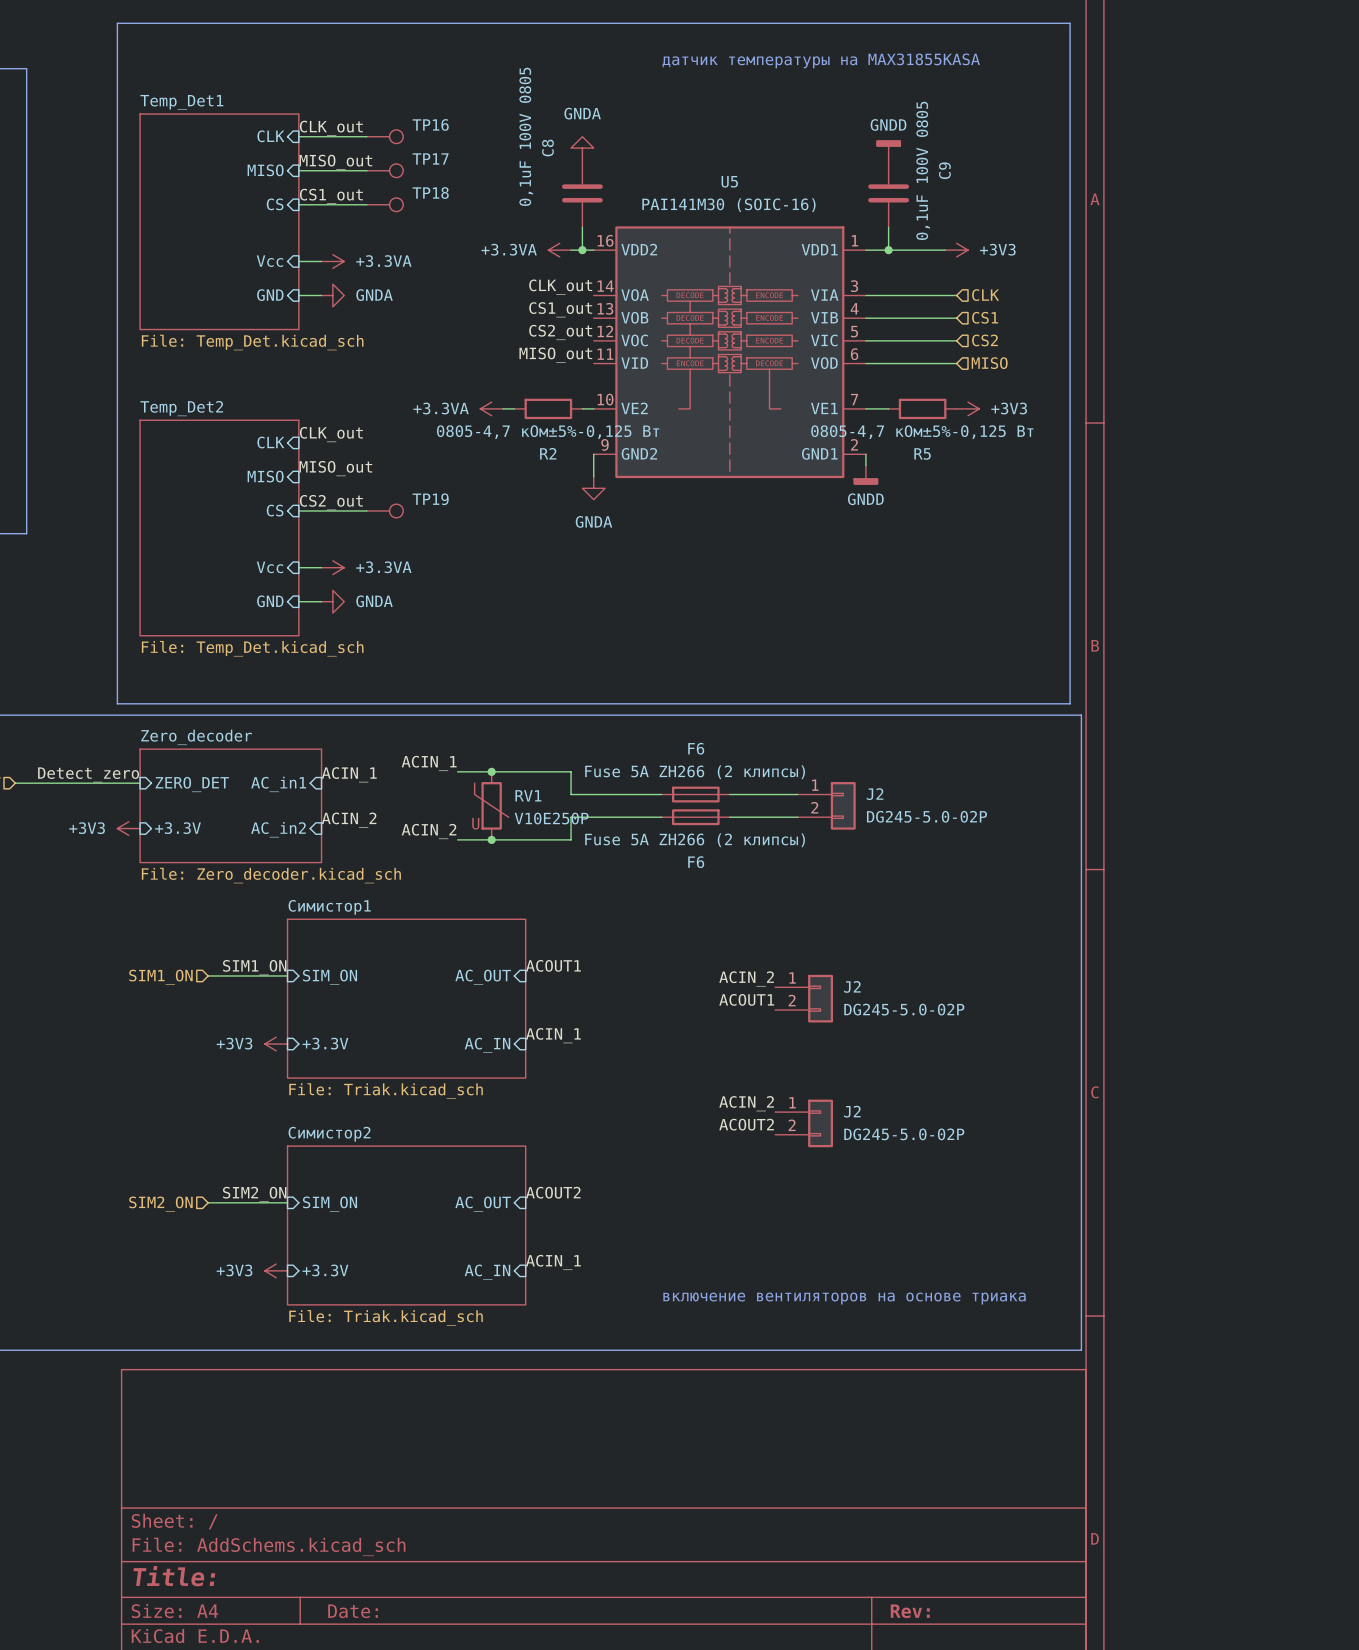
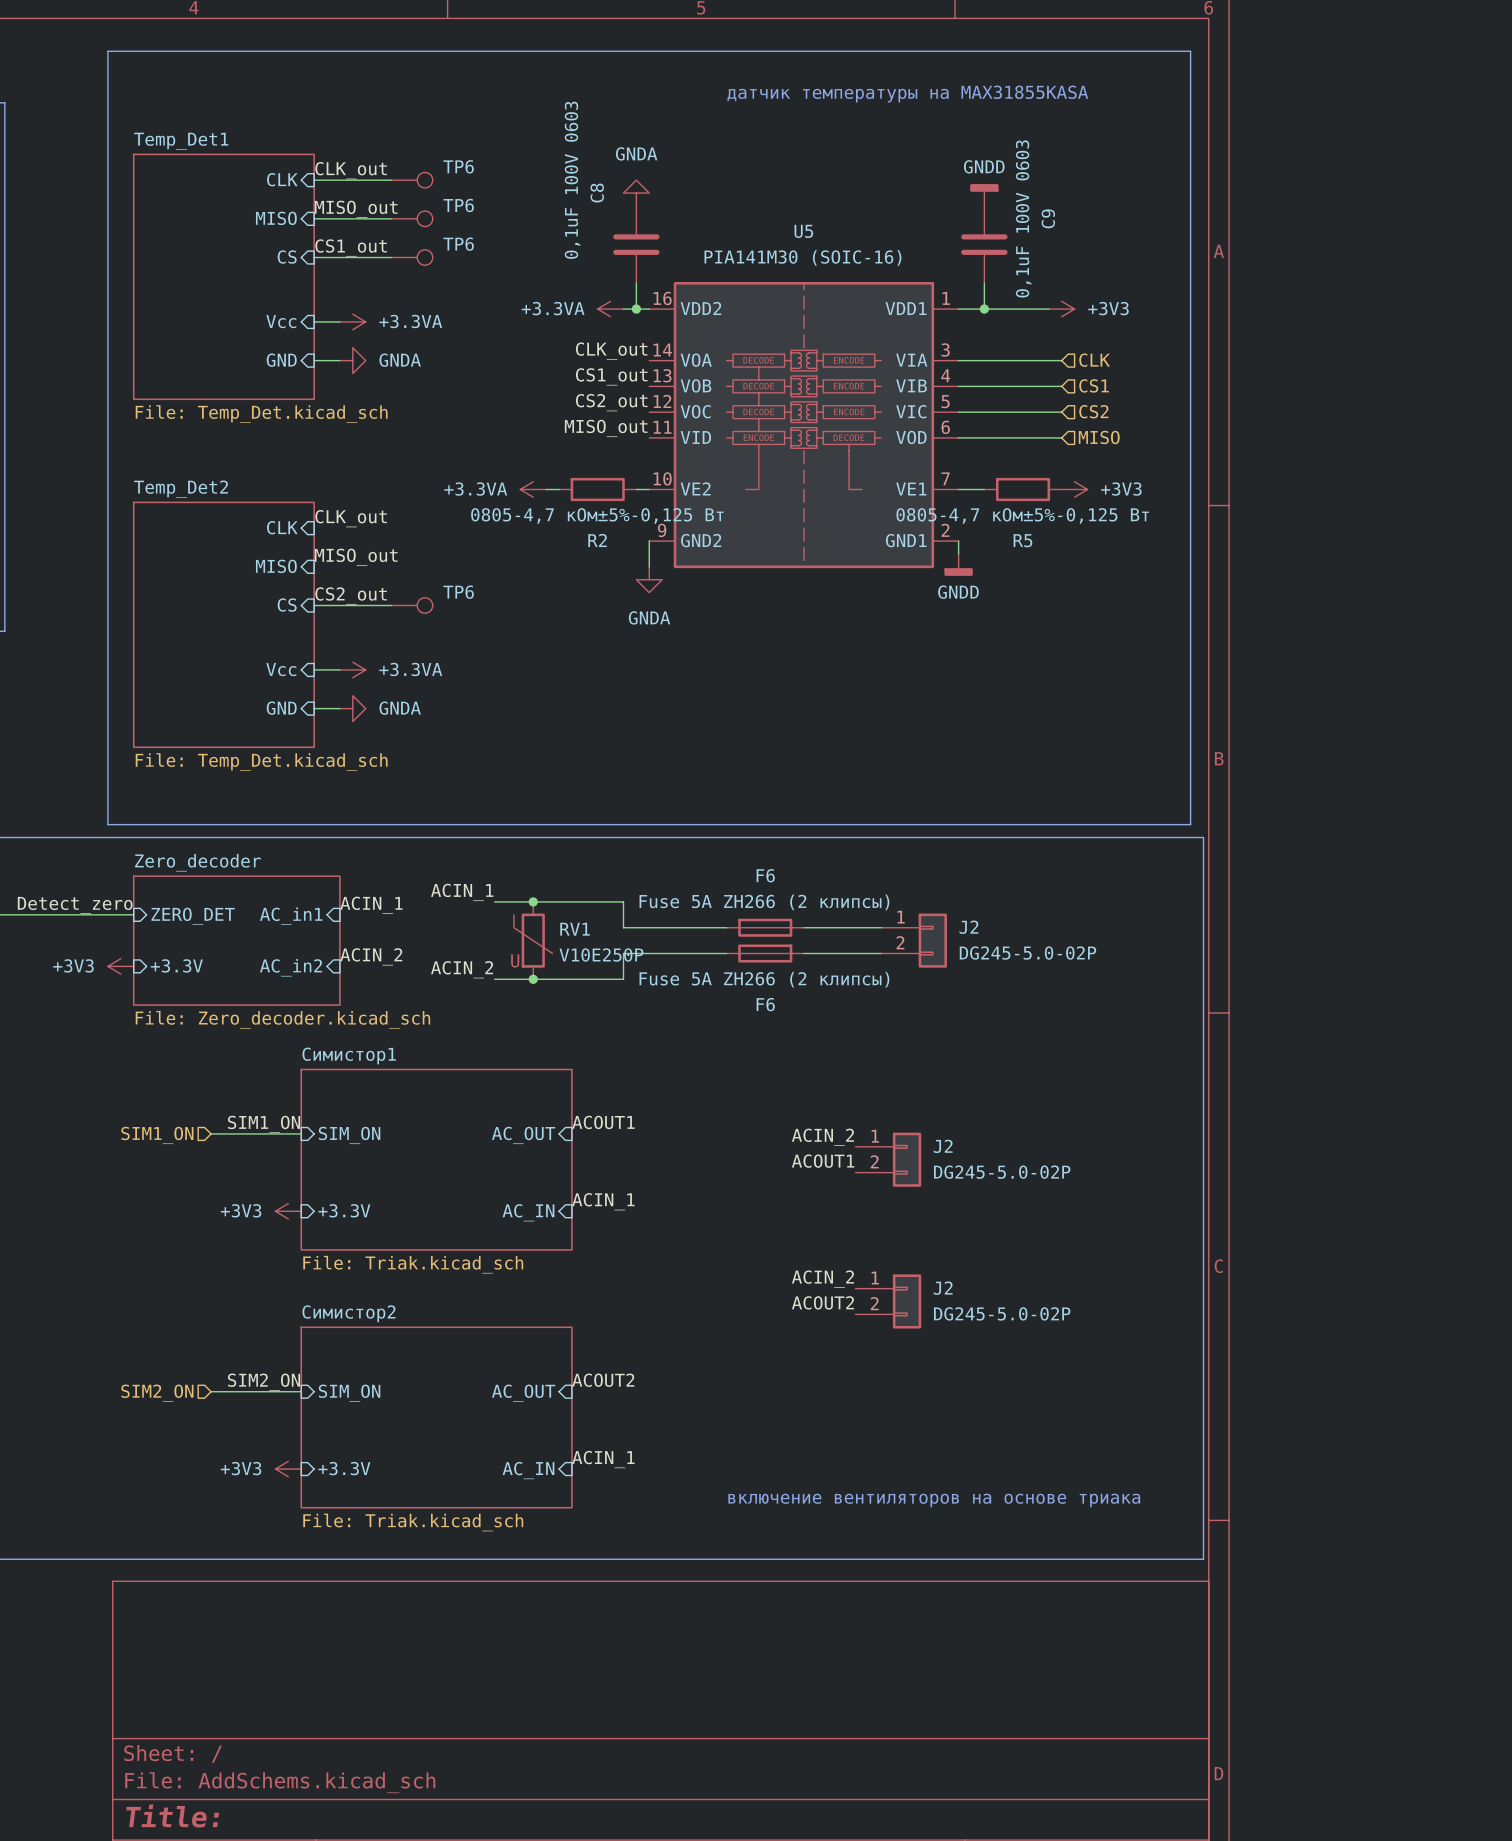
TP16 name: TP16 (430, 124) -> TP6 (458, 166)
C8 value: 0,1uF 100V 0805 (526, 136) -> 0,1uF 100V 0603 (572, 180)
TP17 name: TP17 (430, 158) -> TP6 (458, 205)
C9 value: 0,1uF 100V 0805 (923, 170) -> 0,1uF 100V 0603 (1023, 218)
TP18 name: TP18 (430, 193) -> TP6 (458, 244)
U5 value: PAI141M30 (SOIC-16) (728, 205) -> PIA141M30 (SOIC-16) (802, 257)
TP19 name: TP19 (430, 499) -> TP6 (458, 592)

